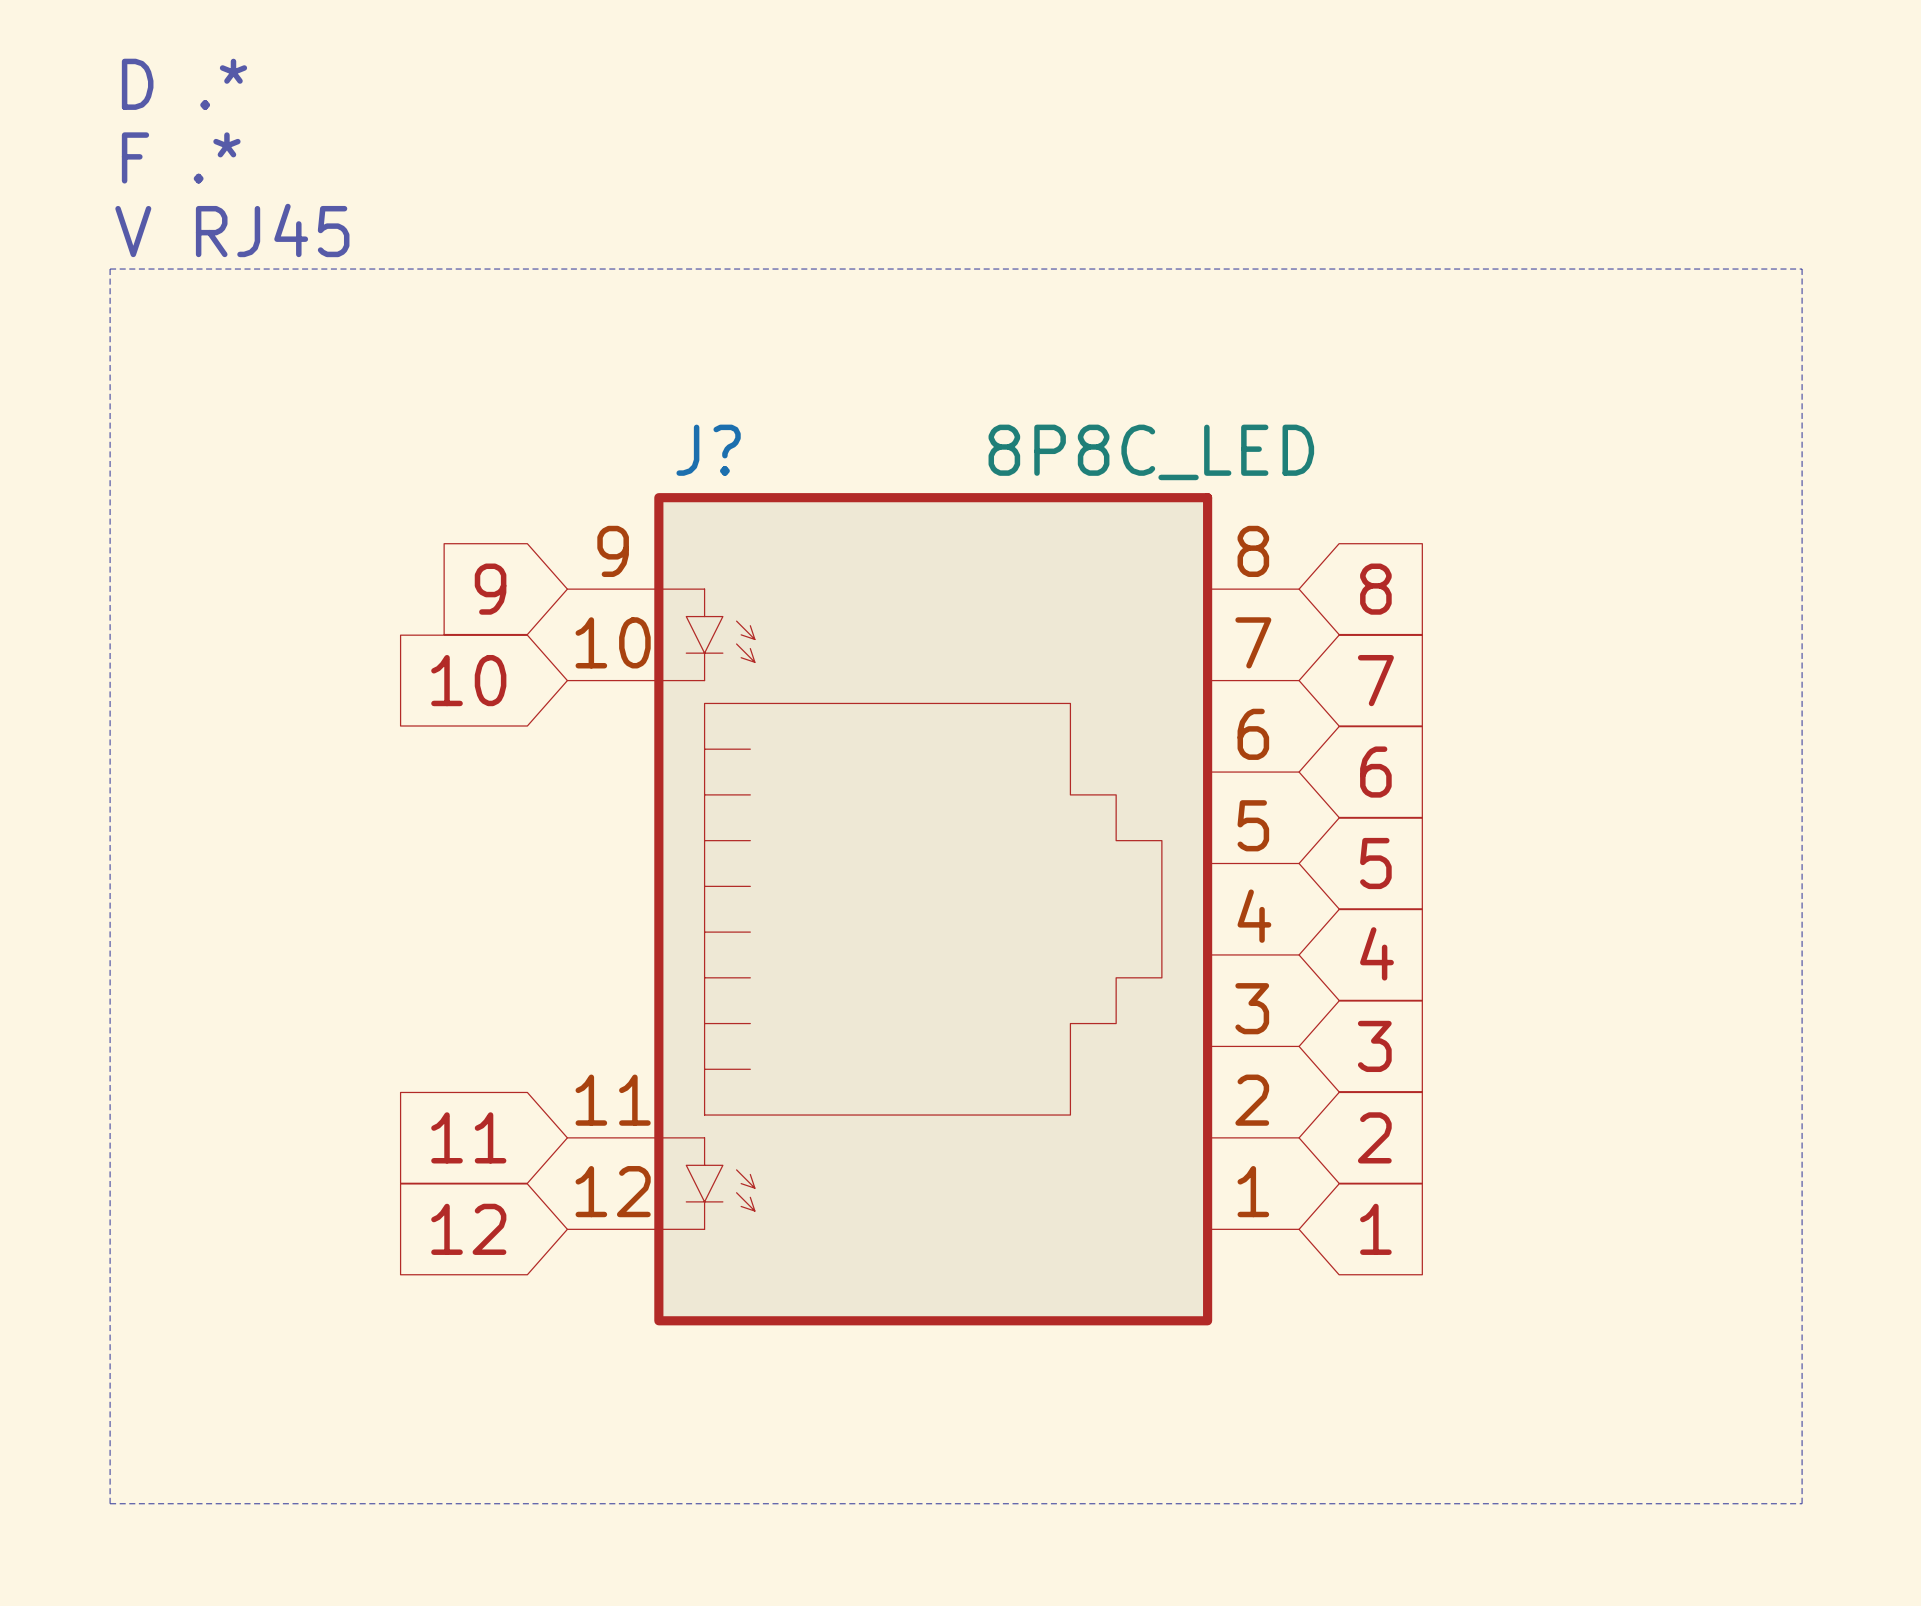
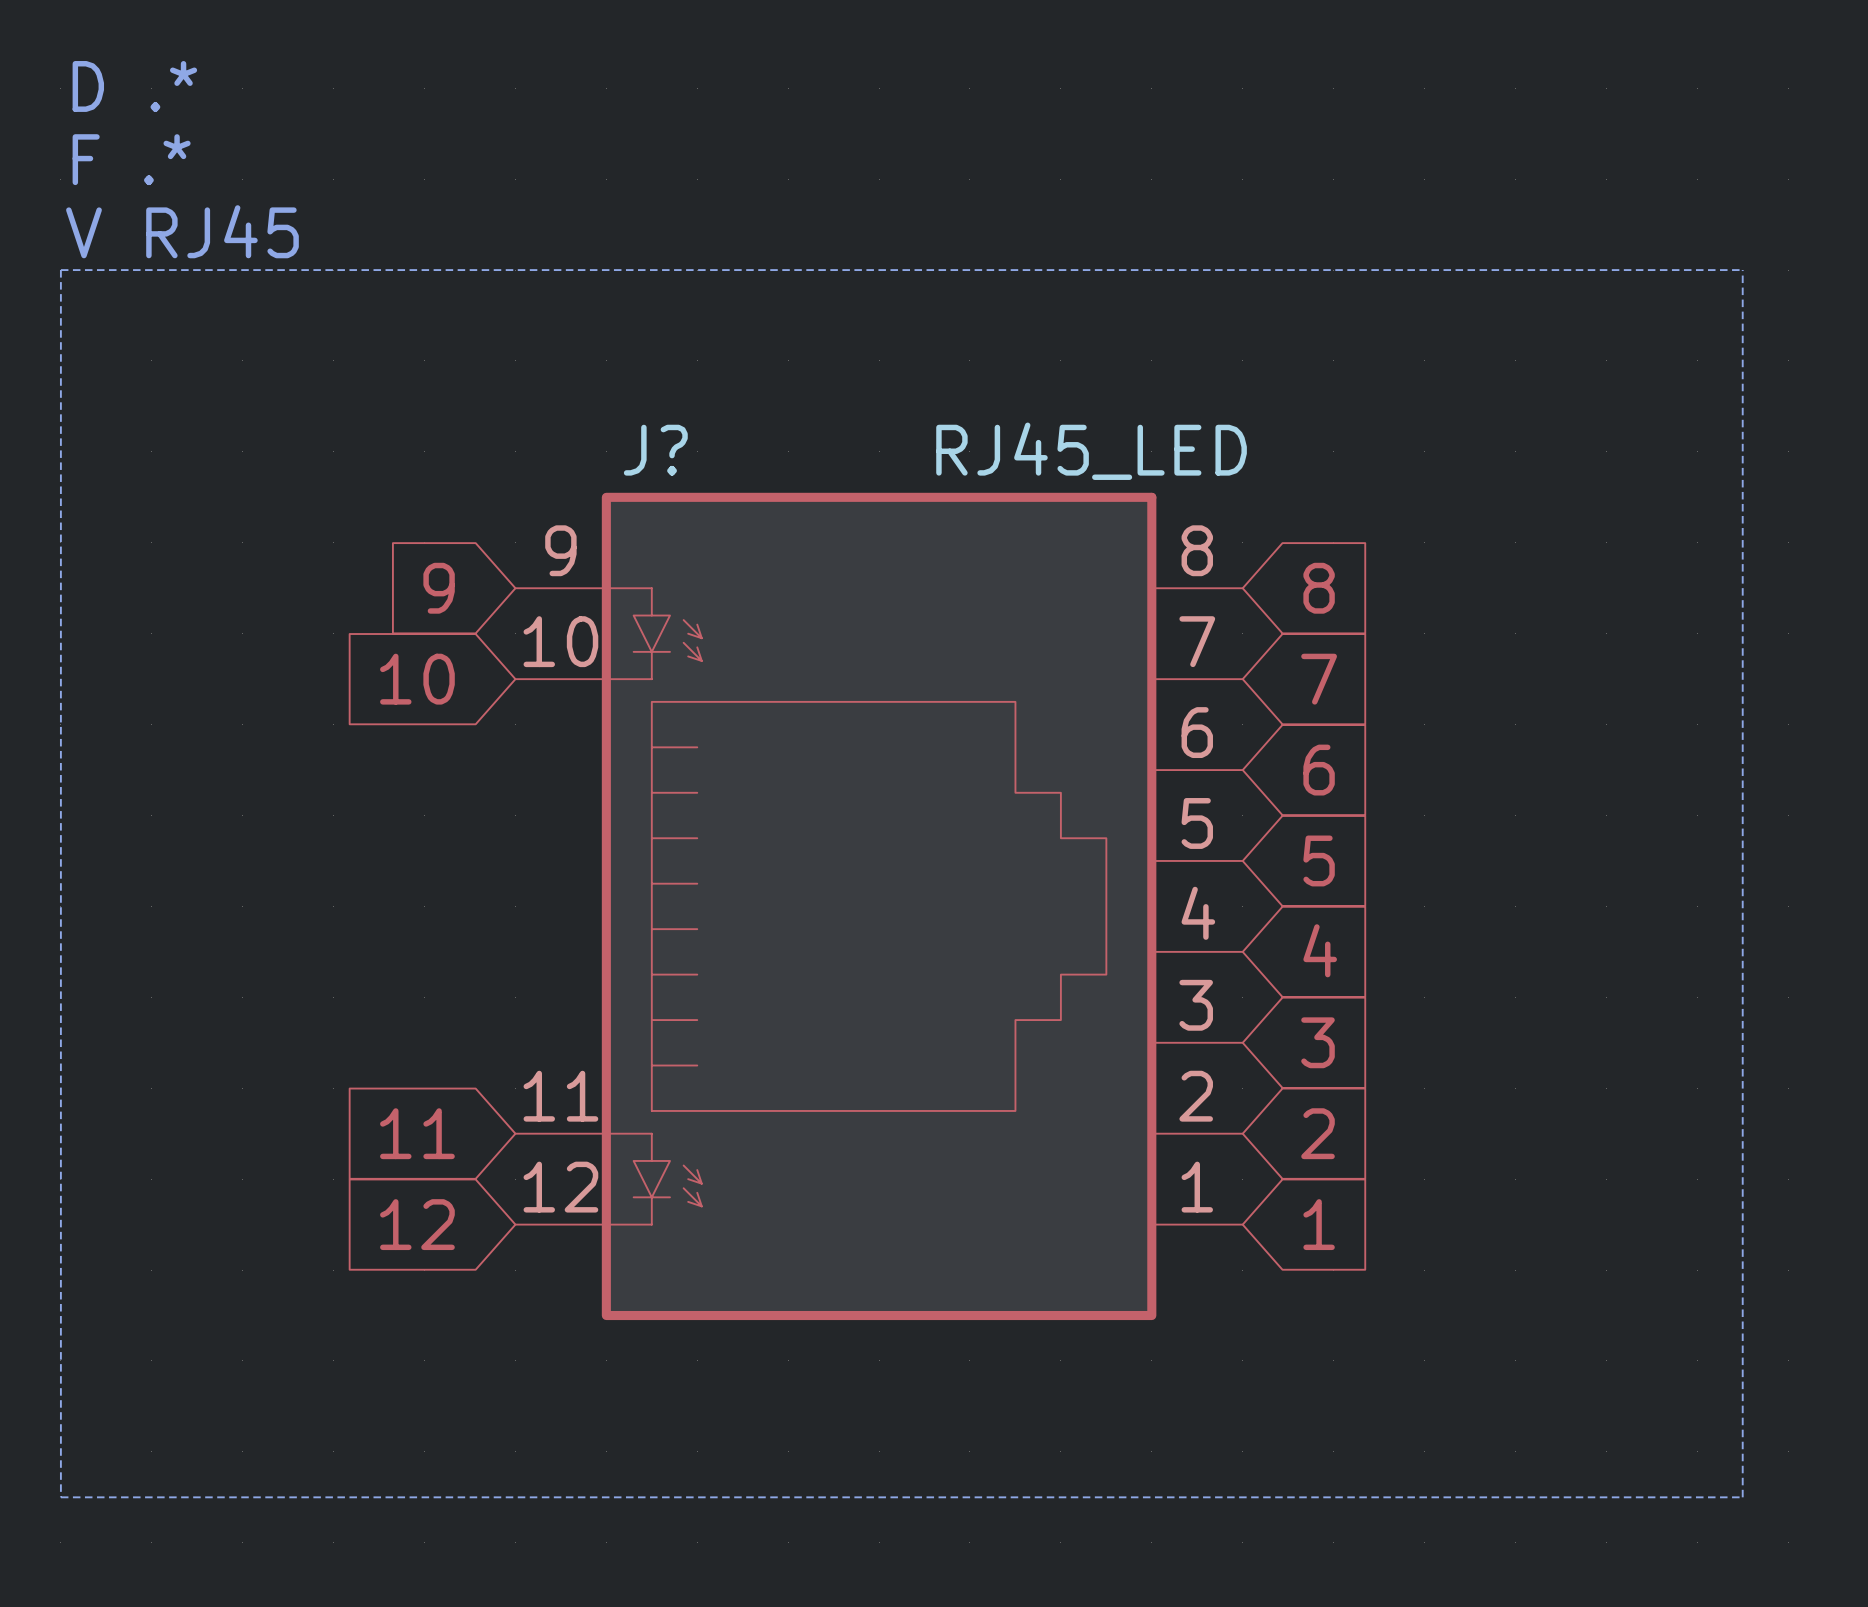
J? value: 8P8C_LED (1151, 452) -> RJ45_LED (1091, 451)

